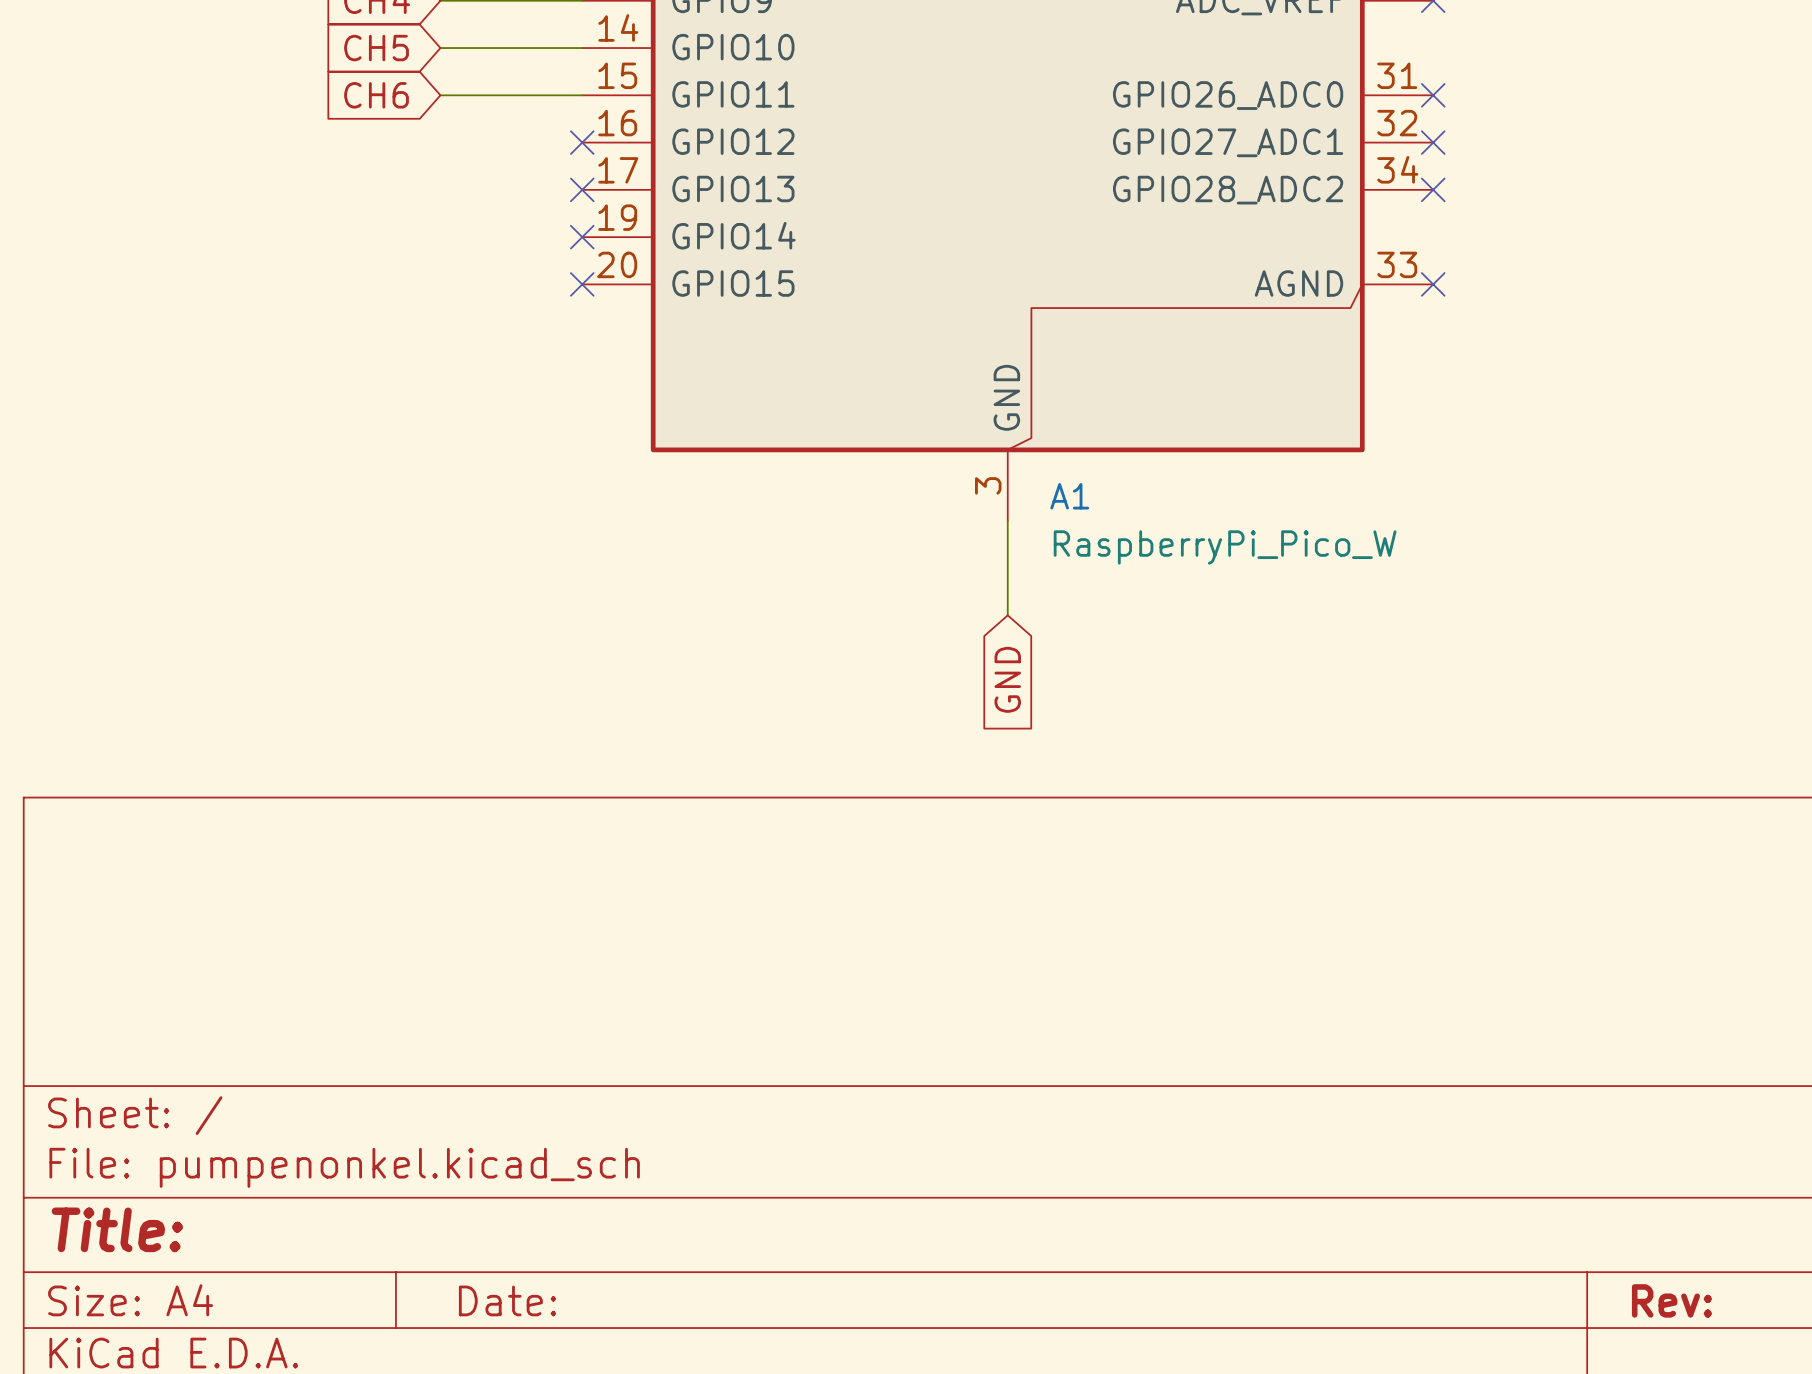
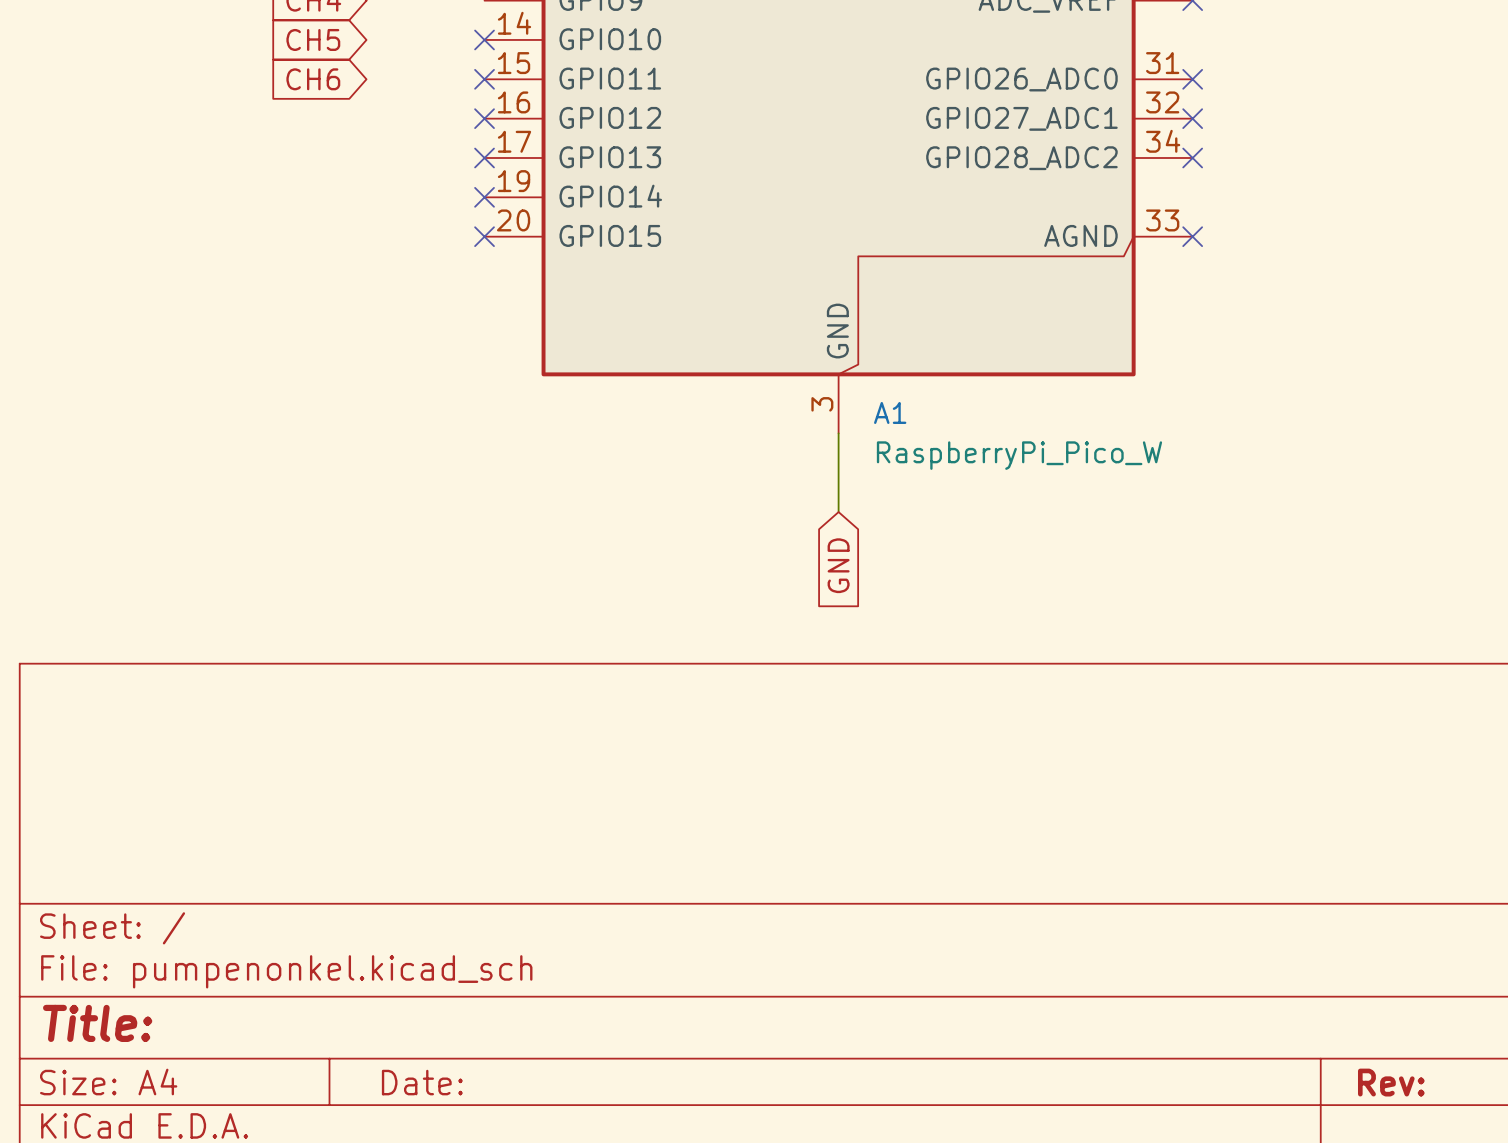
wire: (440, 0) (582, 0) -> none
wire: (440, 48) (582, 48) -> none
no-connect mark: none -> (484, 39)
wire: (440, 95) (582, 95) -> none
no-connect mark: none -> (484, 79)

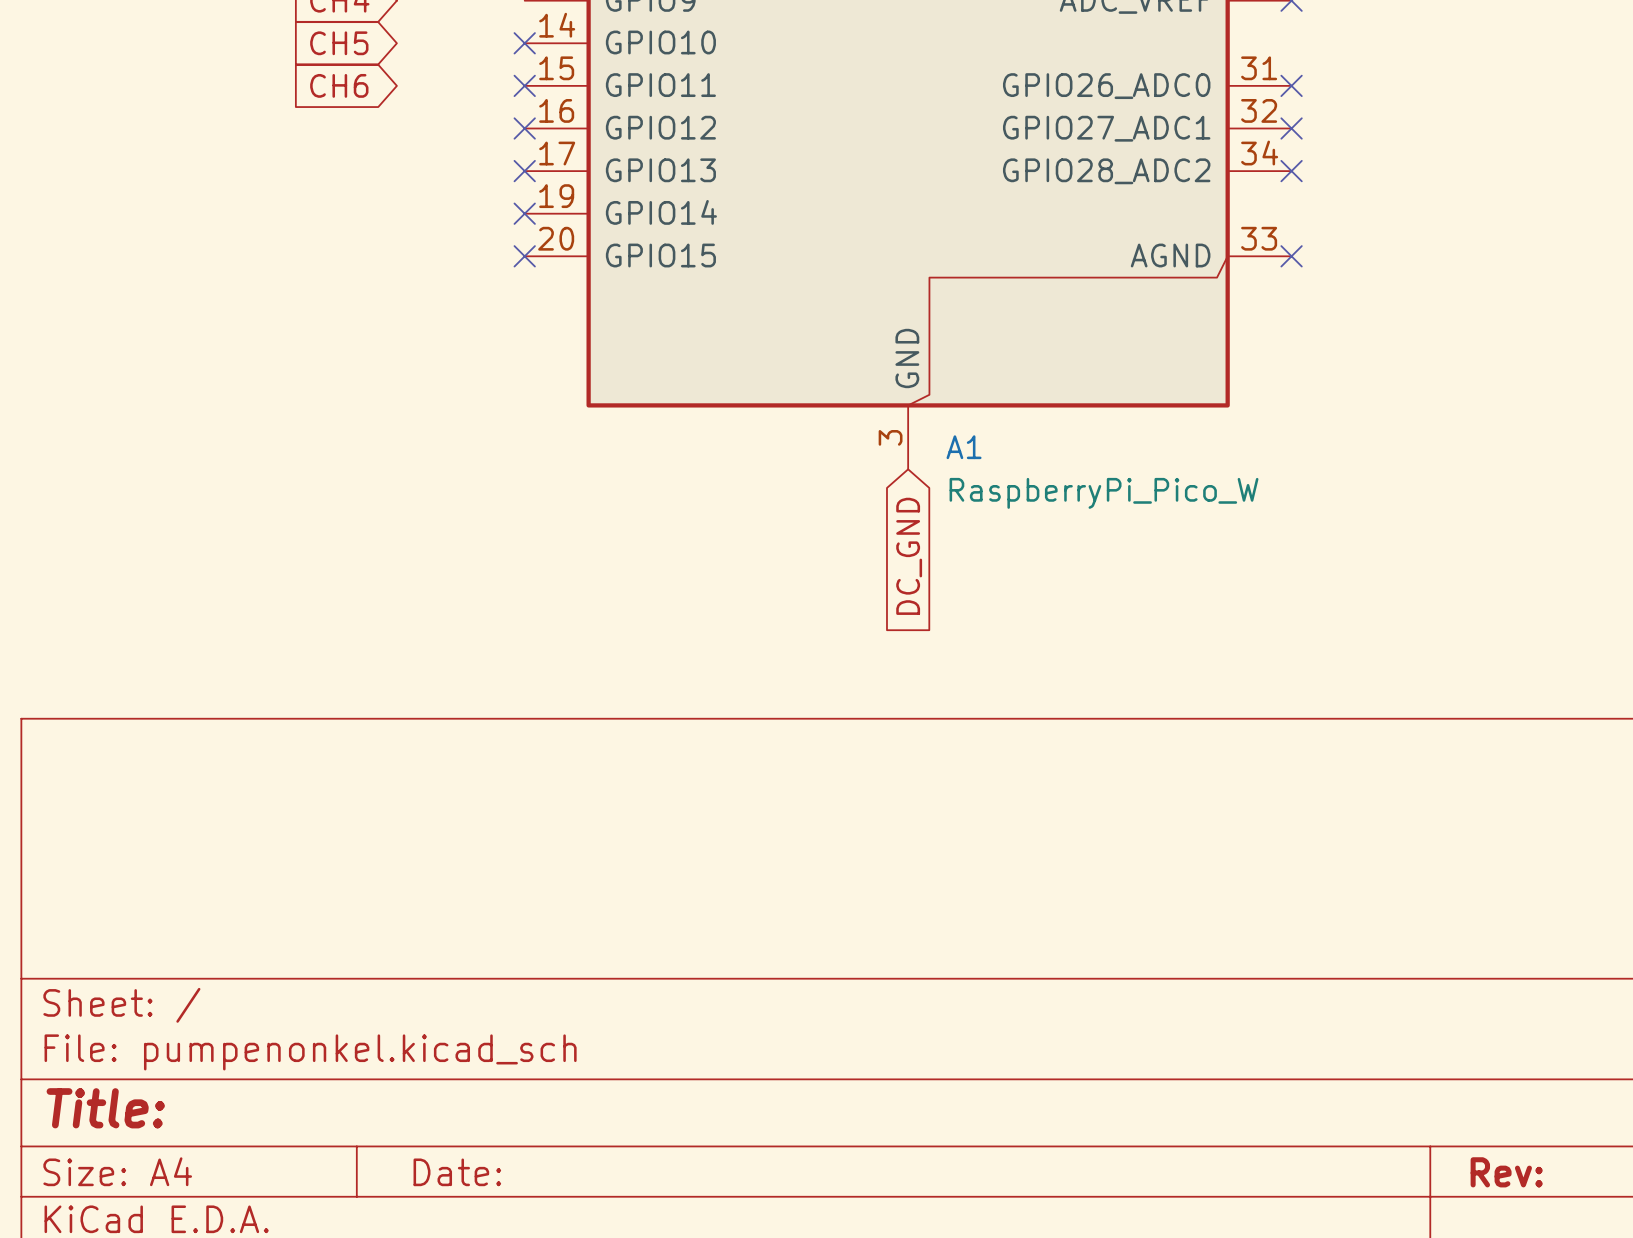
wire: (838, 433) (838, 512) -> none
global label: GND (838, 565) -> DC_GND (909, 556)

